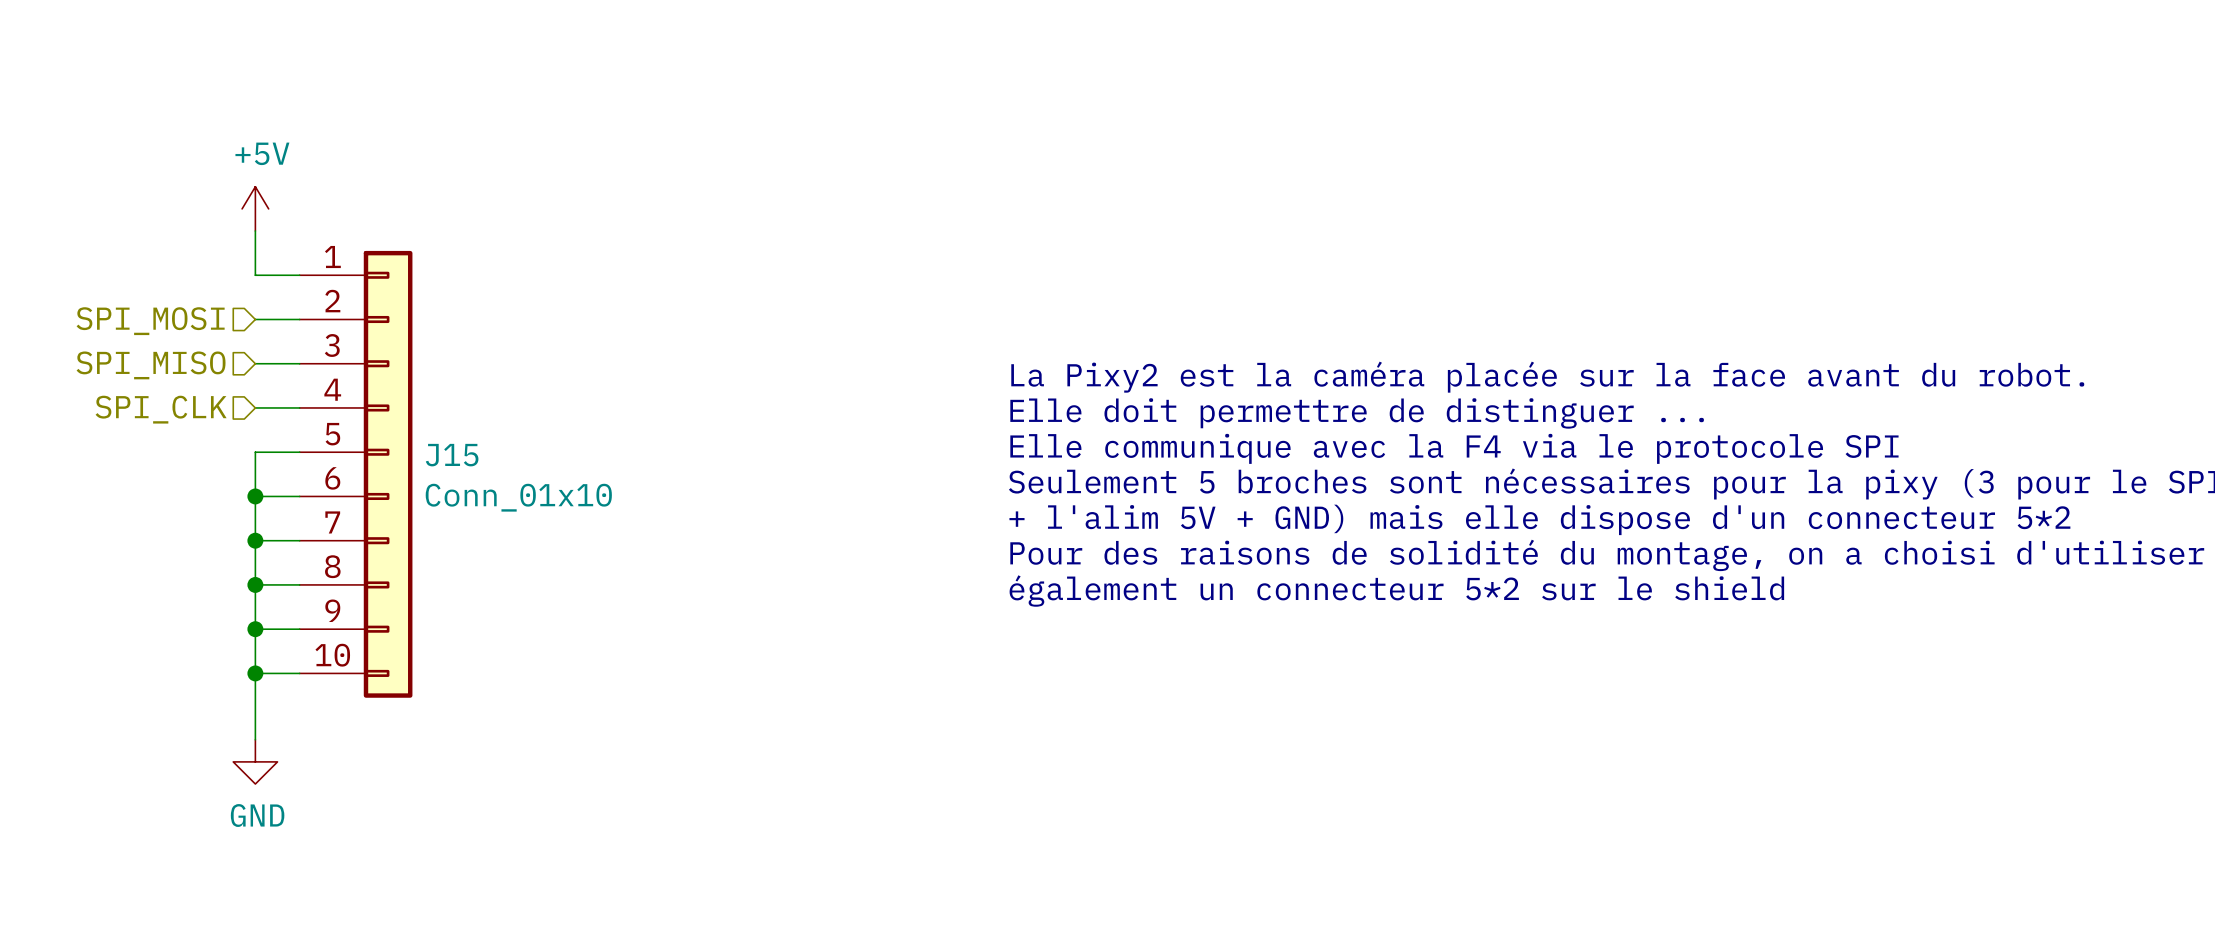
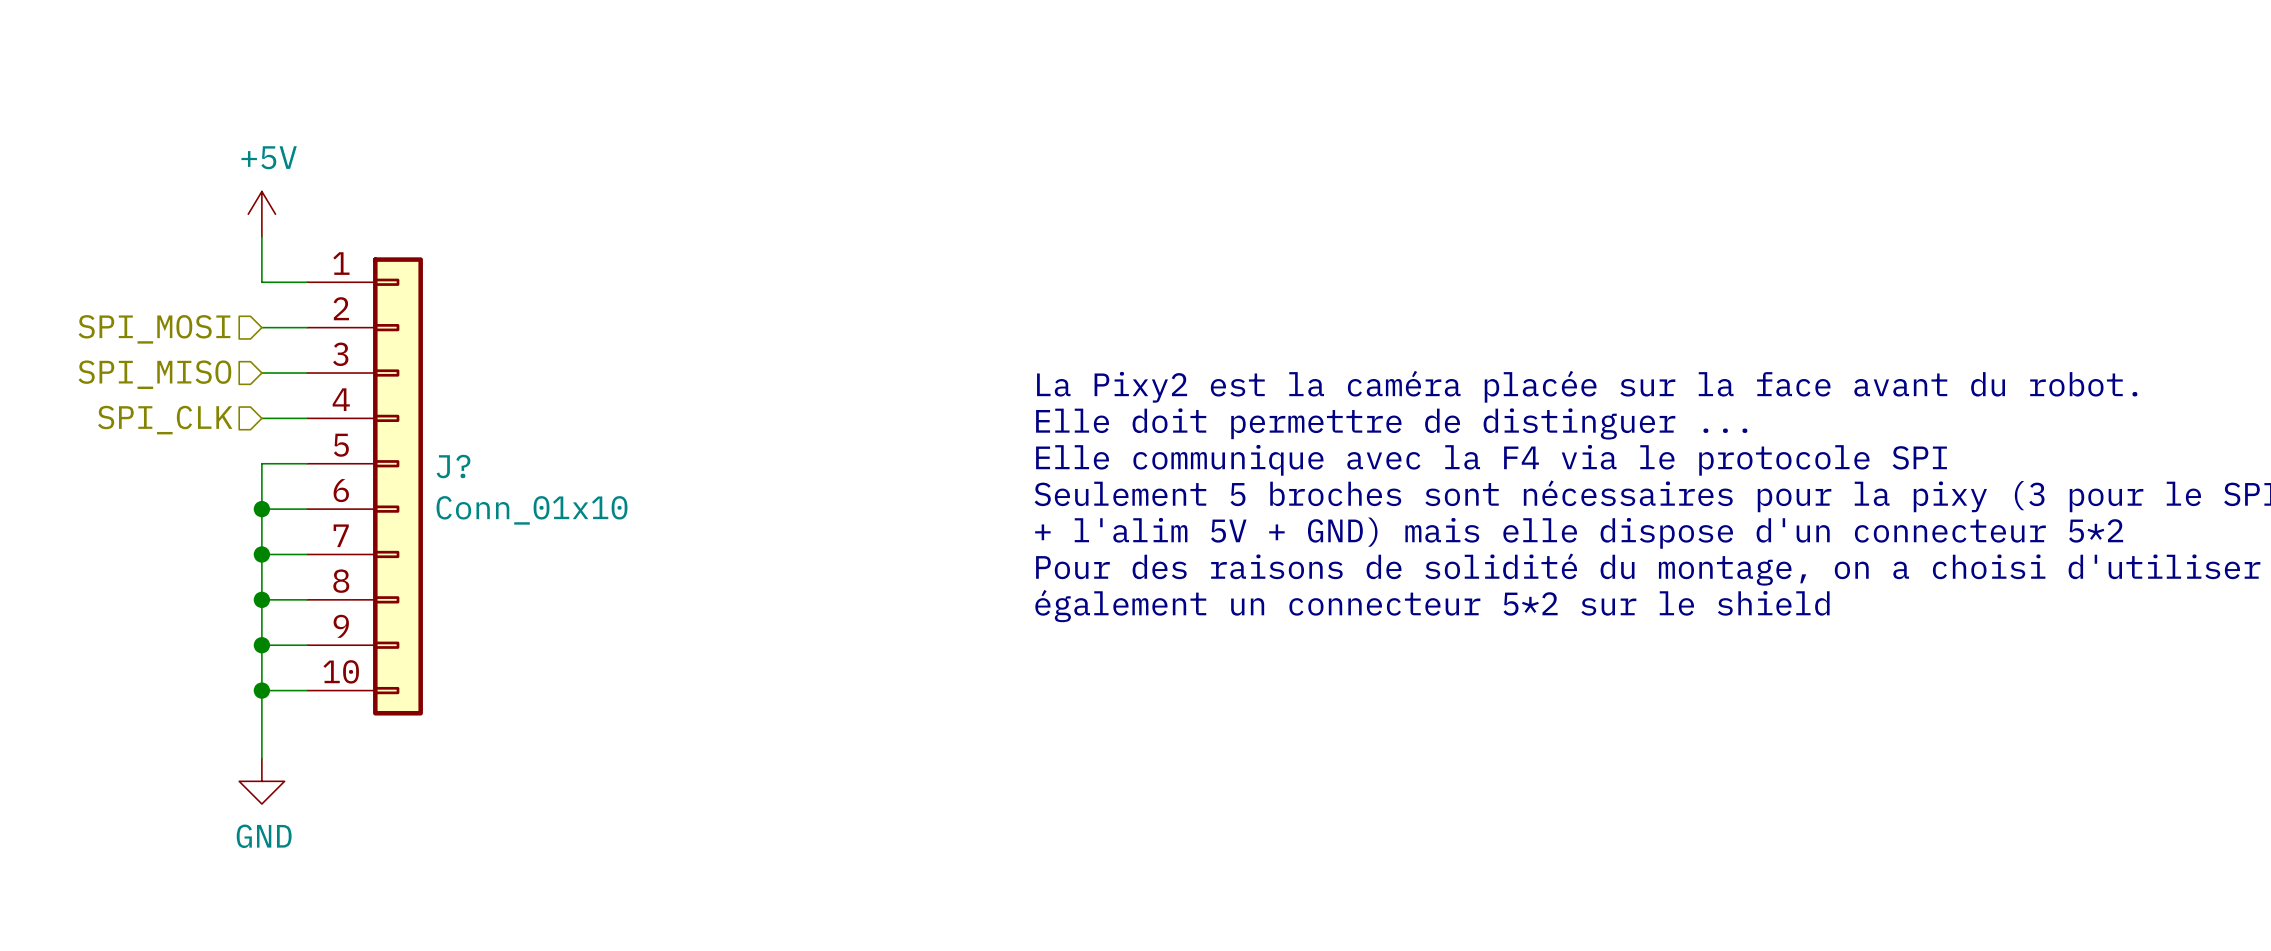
J15 name: J15 (452, 455) -> J? (453, 466)

